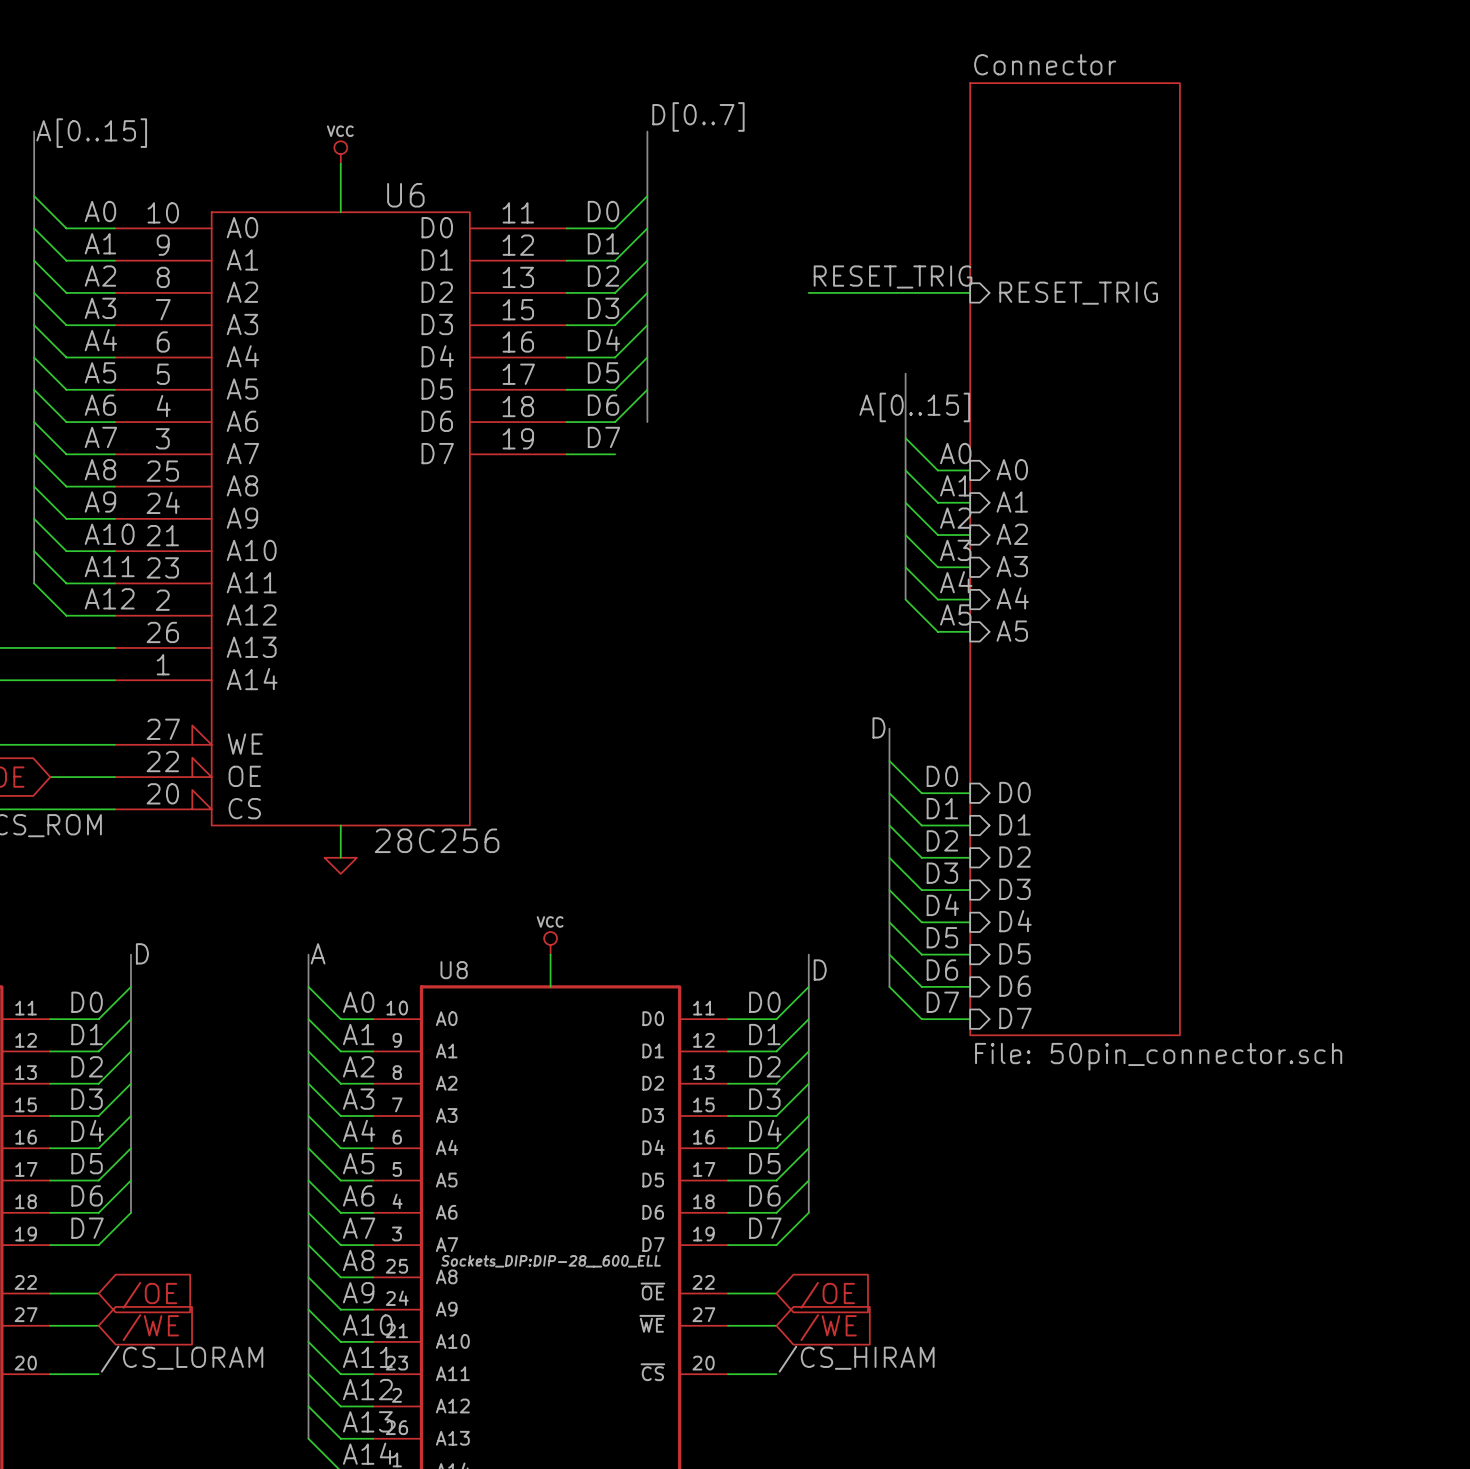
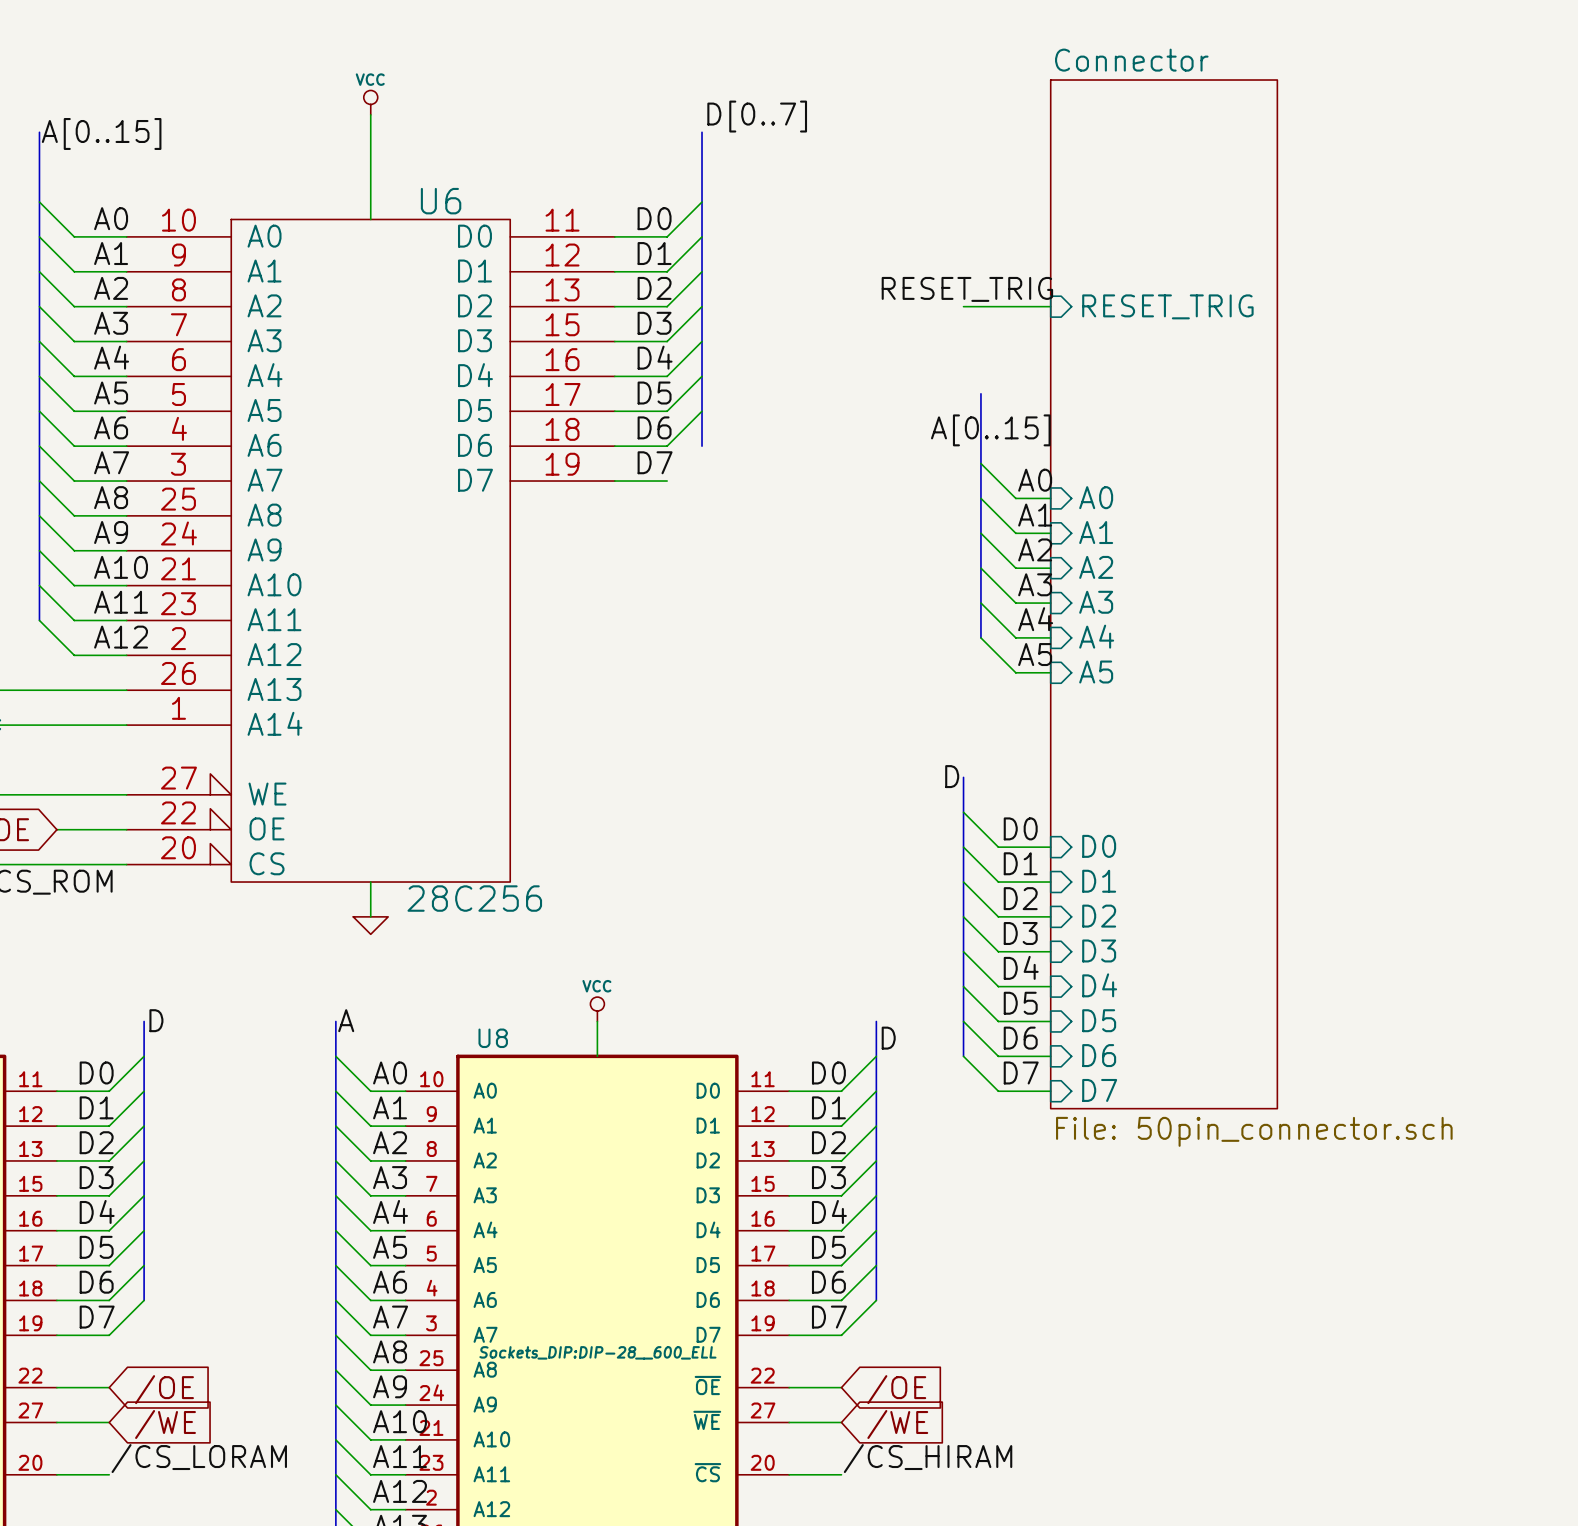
wire: none -> (370, 114) (370, 167)
power symbol position: VCC (340, 152) -> VCC (370, 102)
wire: (808, 292) (889, 292) -> none

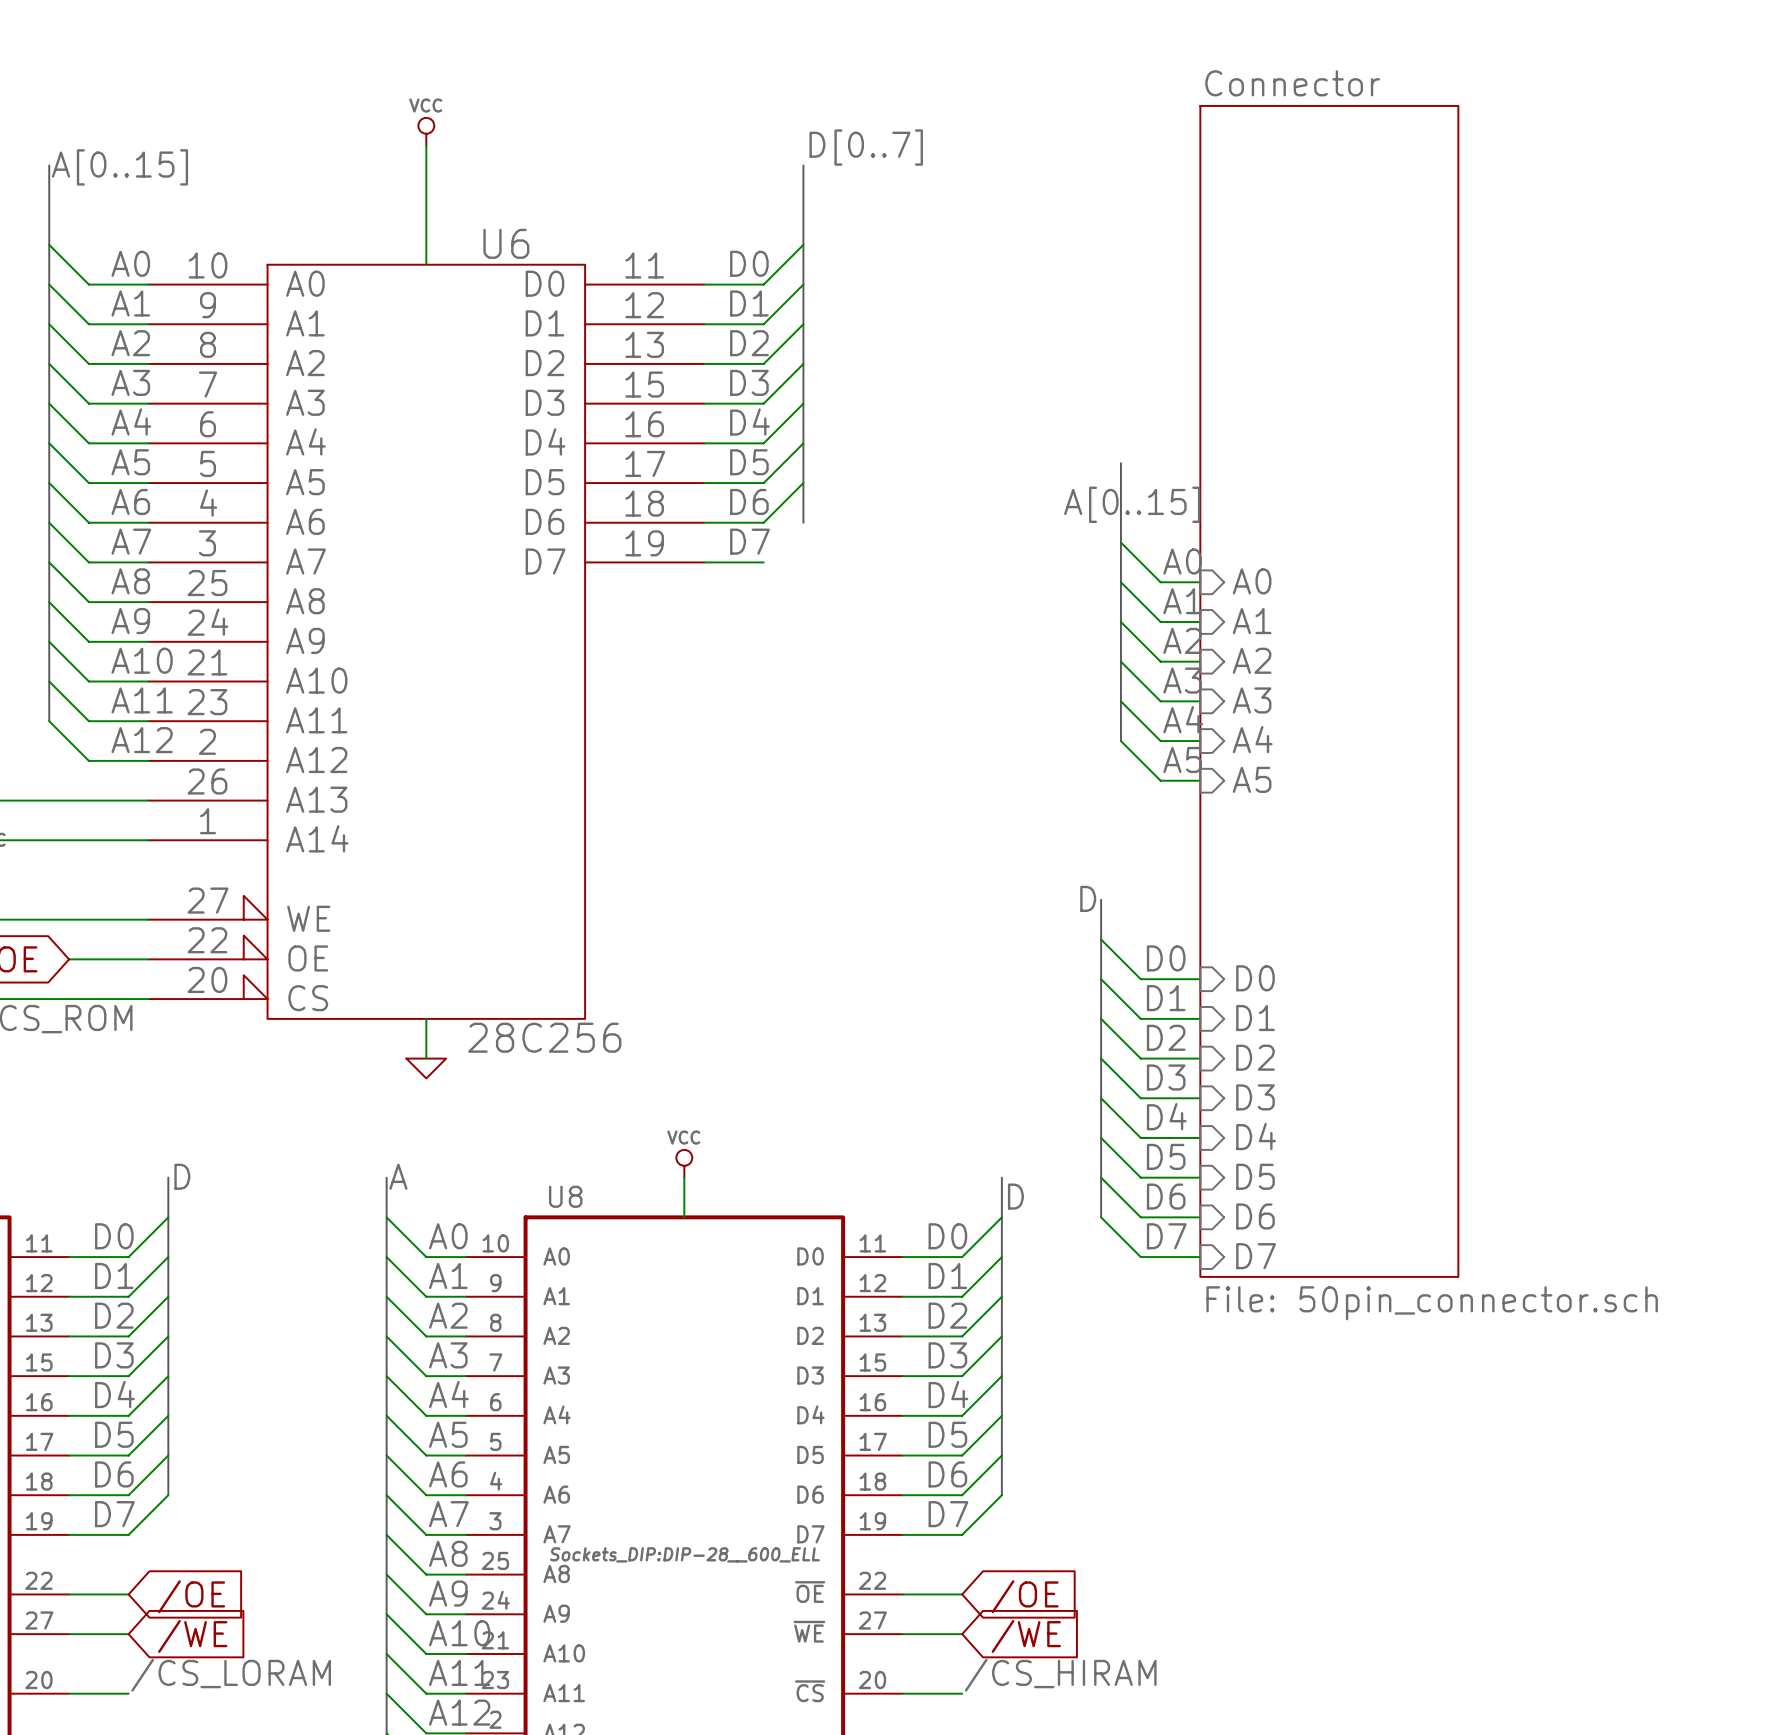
label: RESET_TRIG (967, 289) -> none
wire: (963, 306) (1050, 306) -> none
sheet pin: RESET_TRIG (1167, 306) -> none

